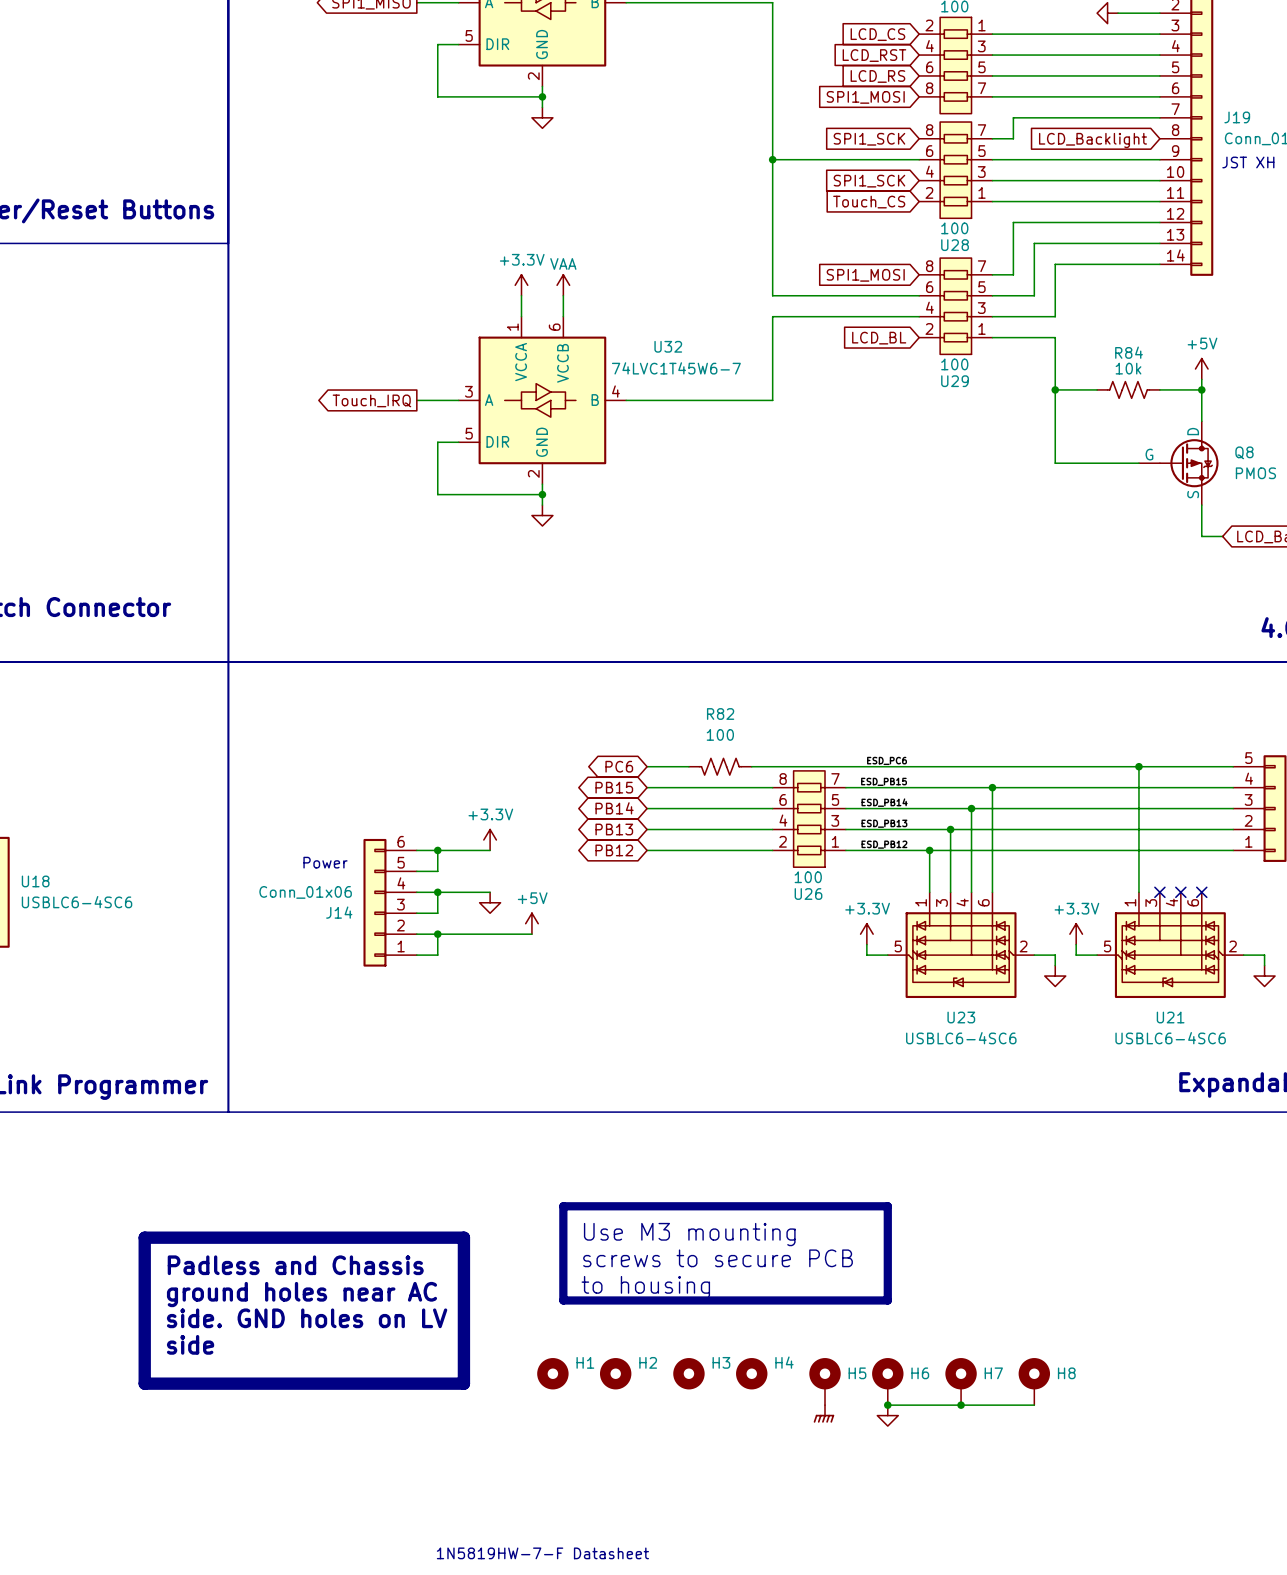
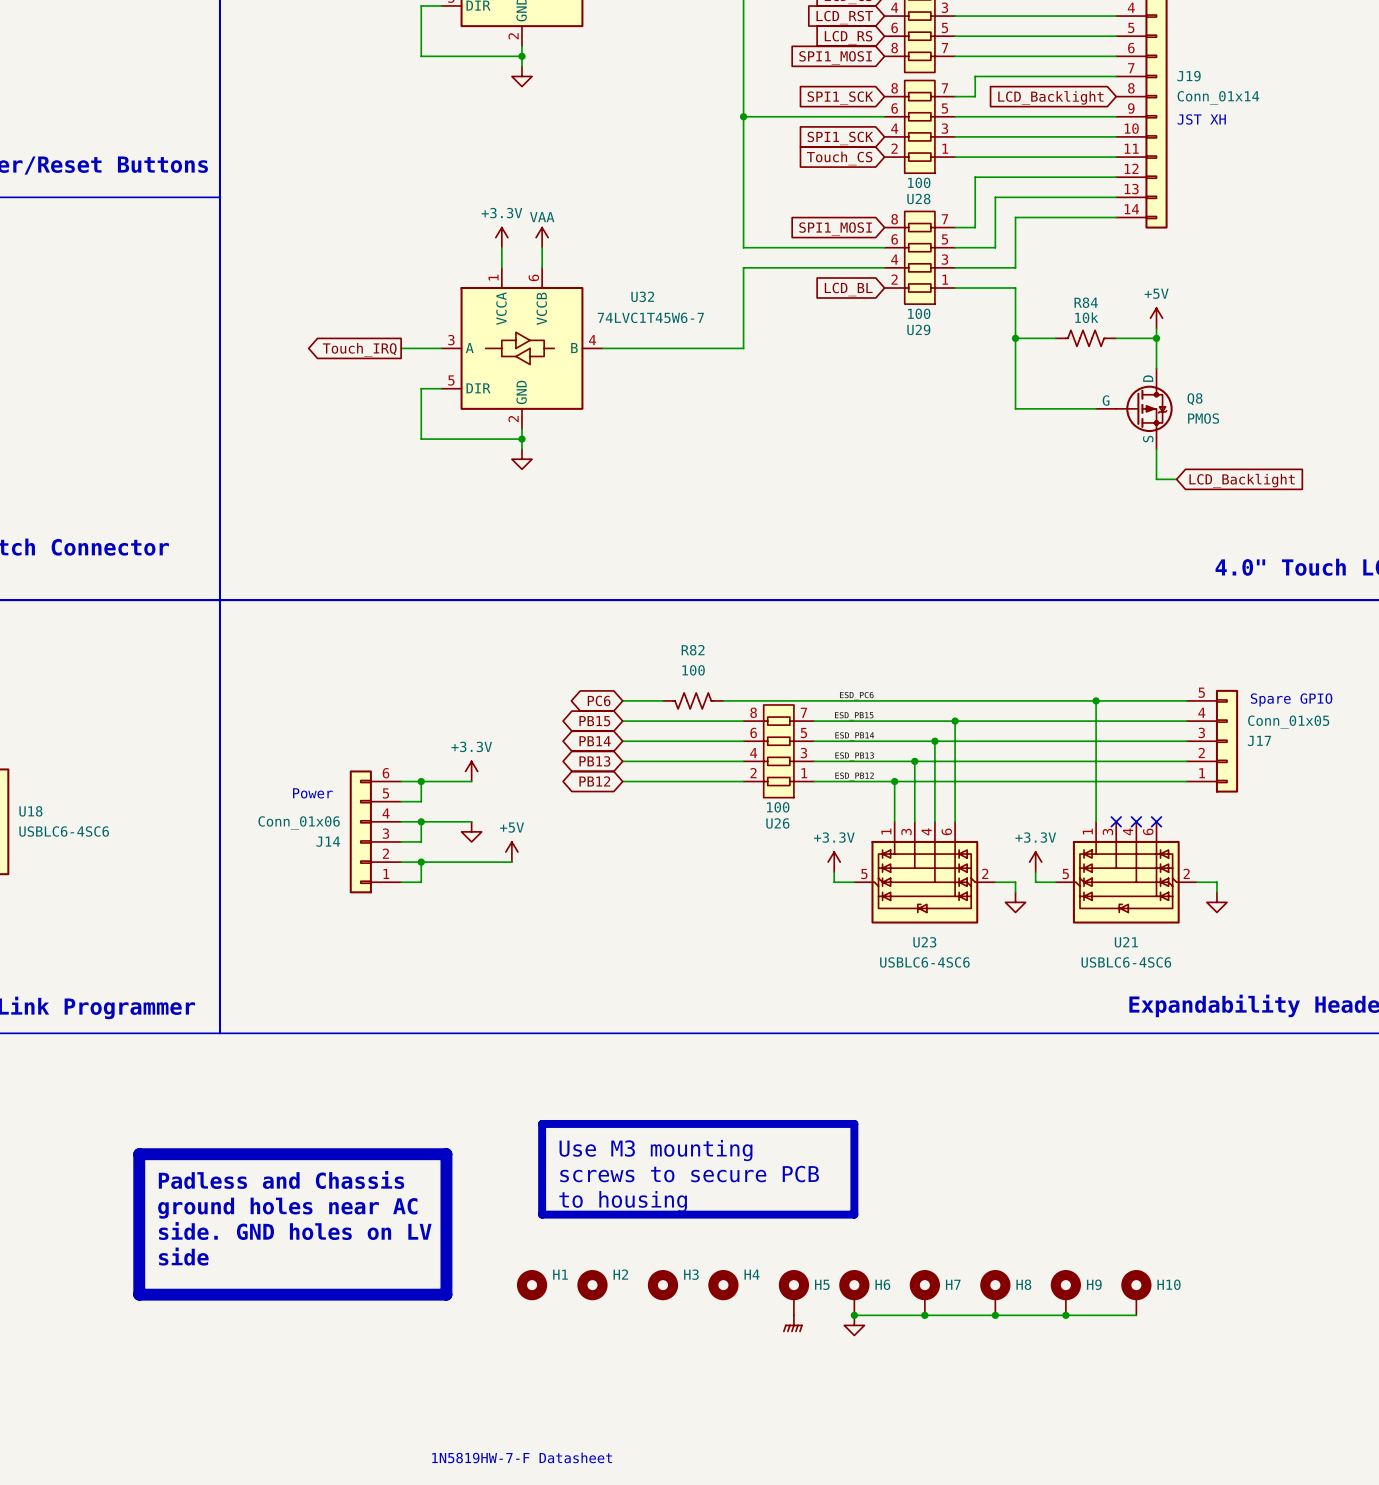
H9: none -> (1065, 1292)
H10: none -> (1136, 1292)
wire: none -> (995, 1315) (1136, 1315)
junction: none -> (995, 1315)
junction: none -> (1065, 1315)

